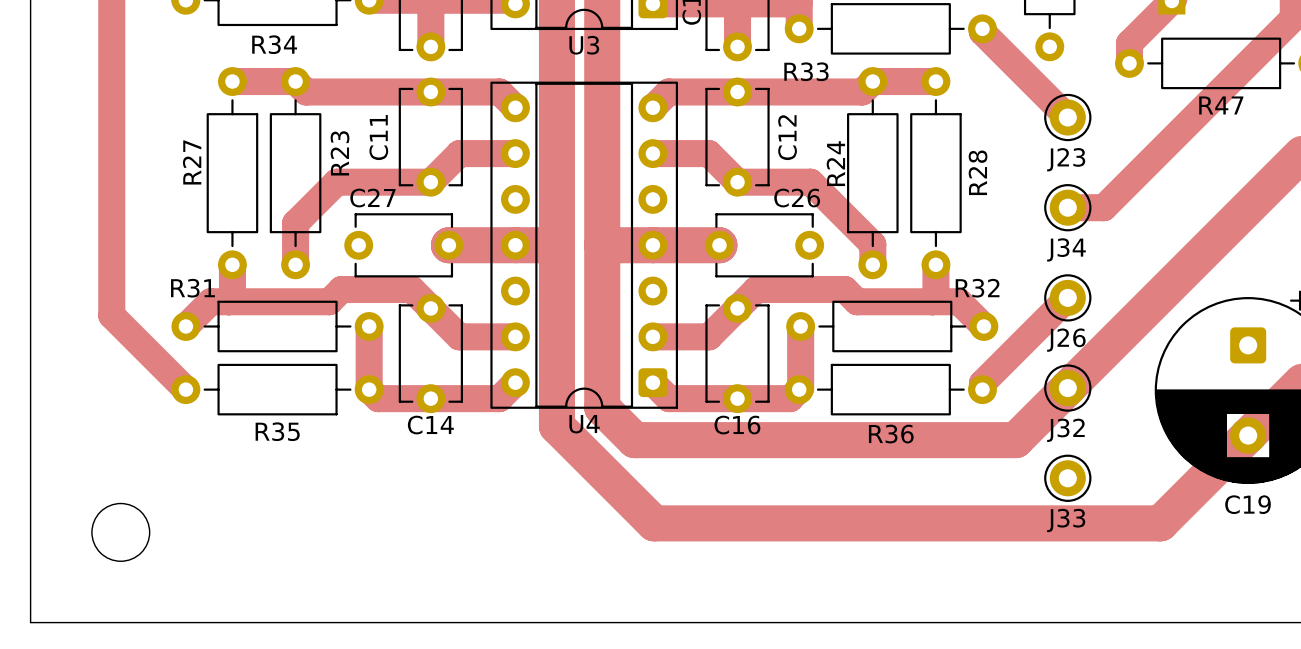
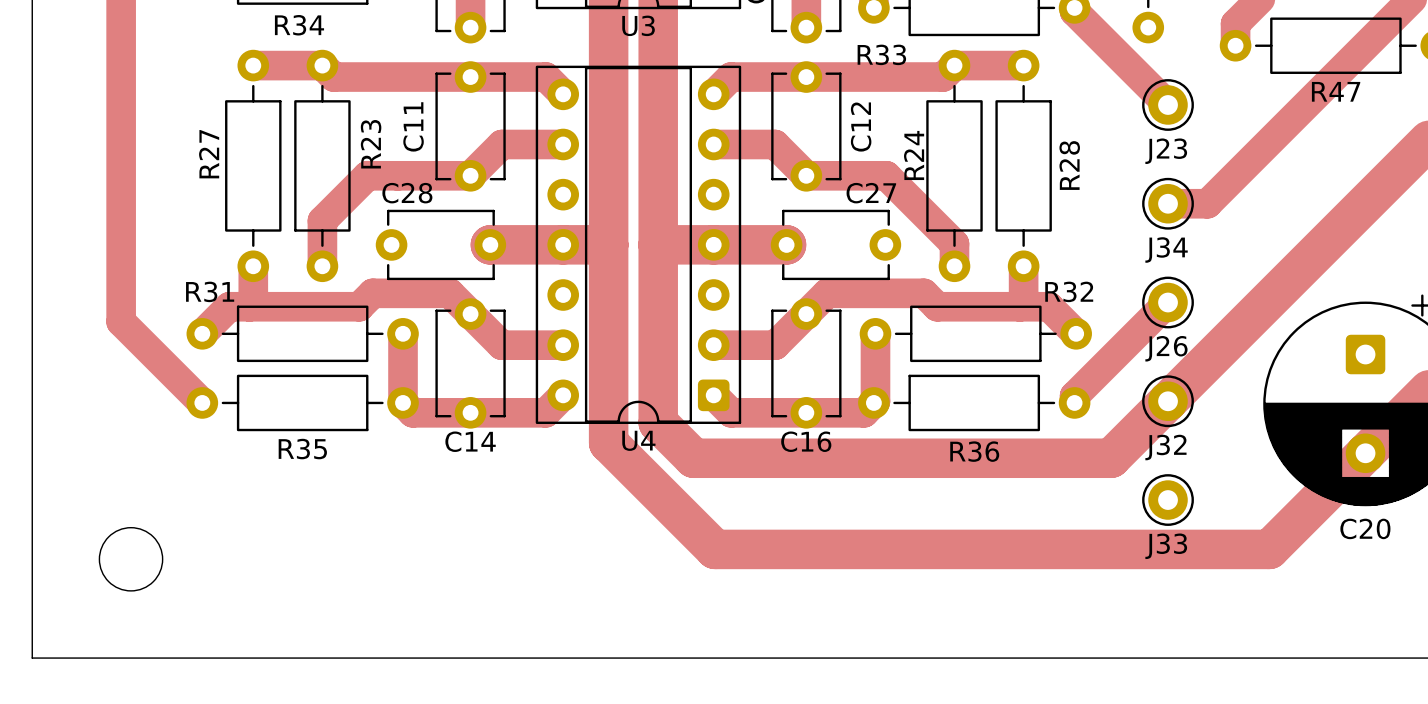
C27 name: C27 (372, 198) -> C28 (407, 193)
C26 name: C26 (797, 198) -> C27 (871, 193)
C19 name: C19 (1248, 504) -> C20 (1365, 528)

